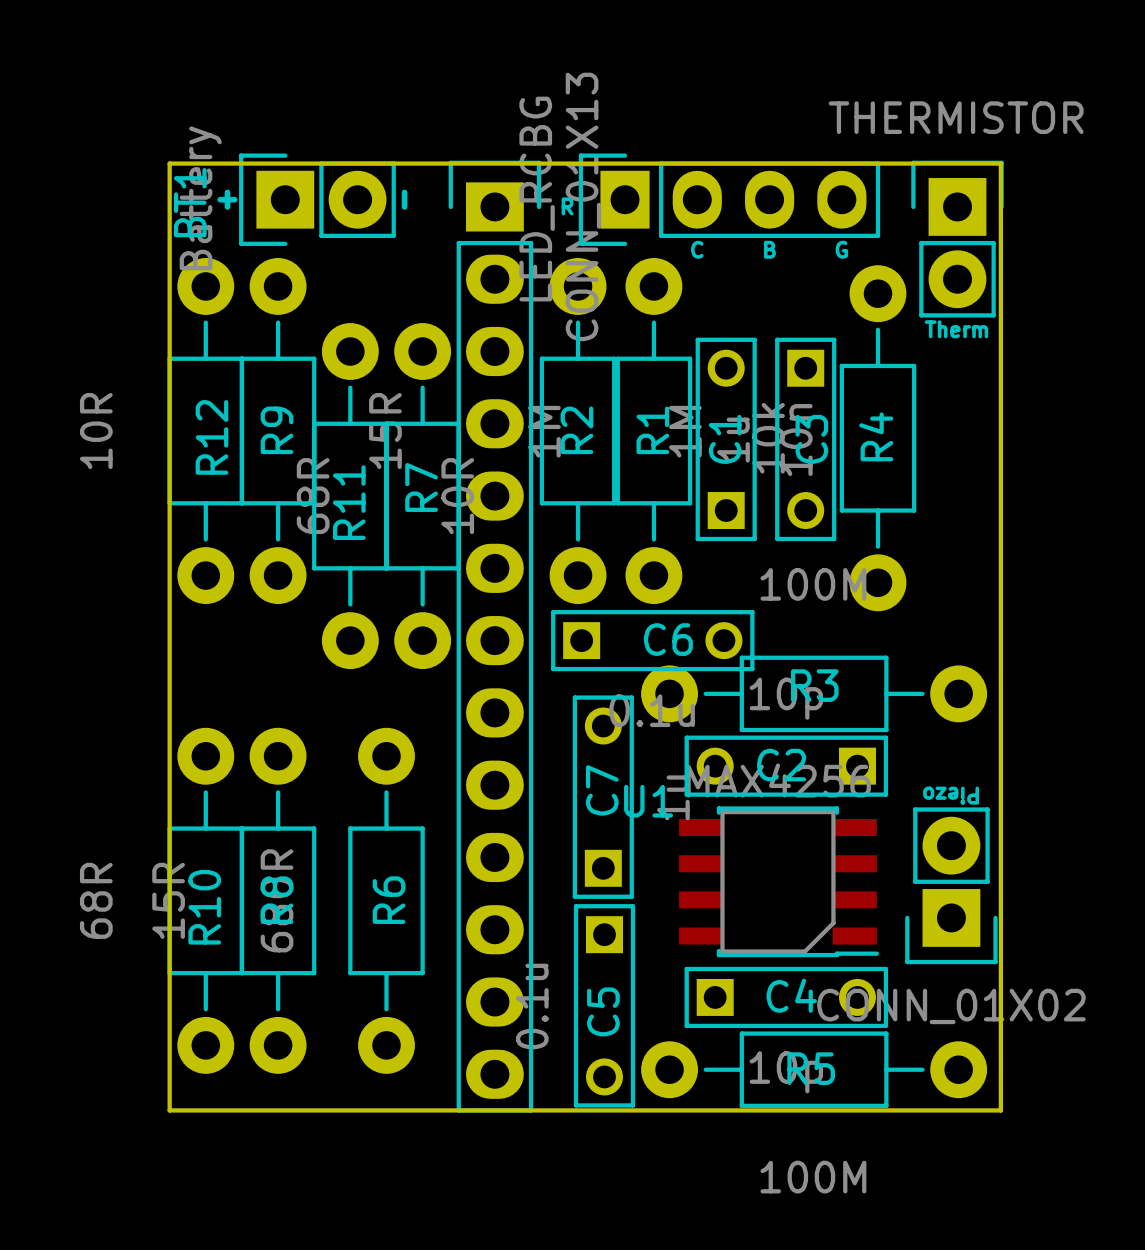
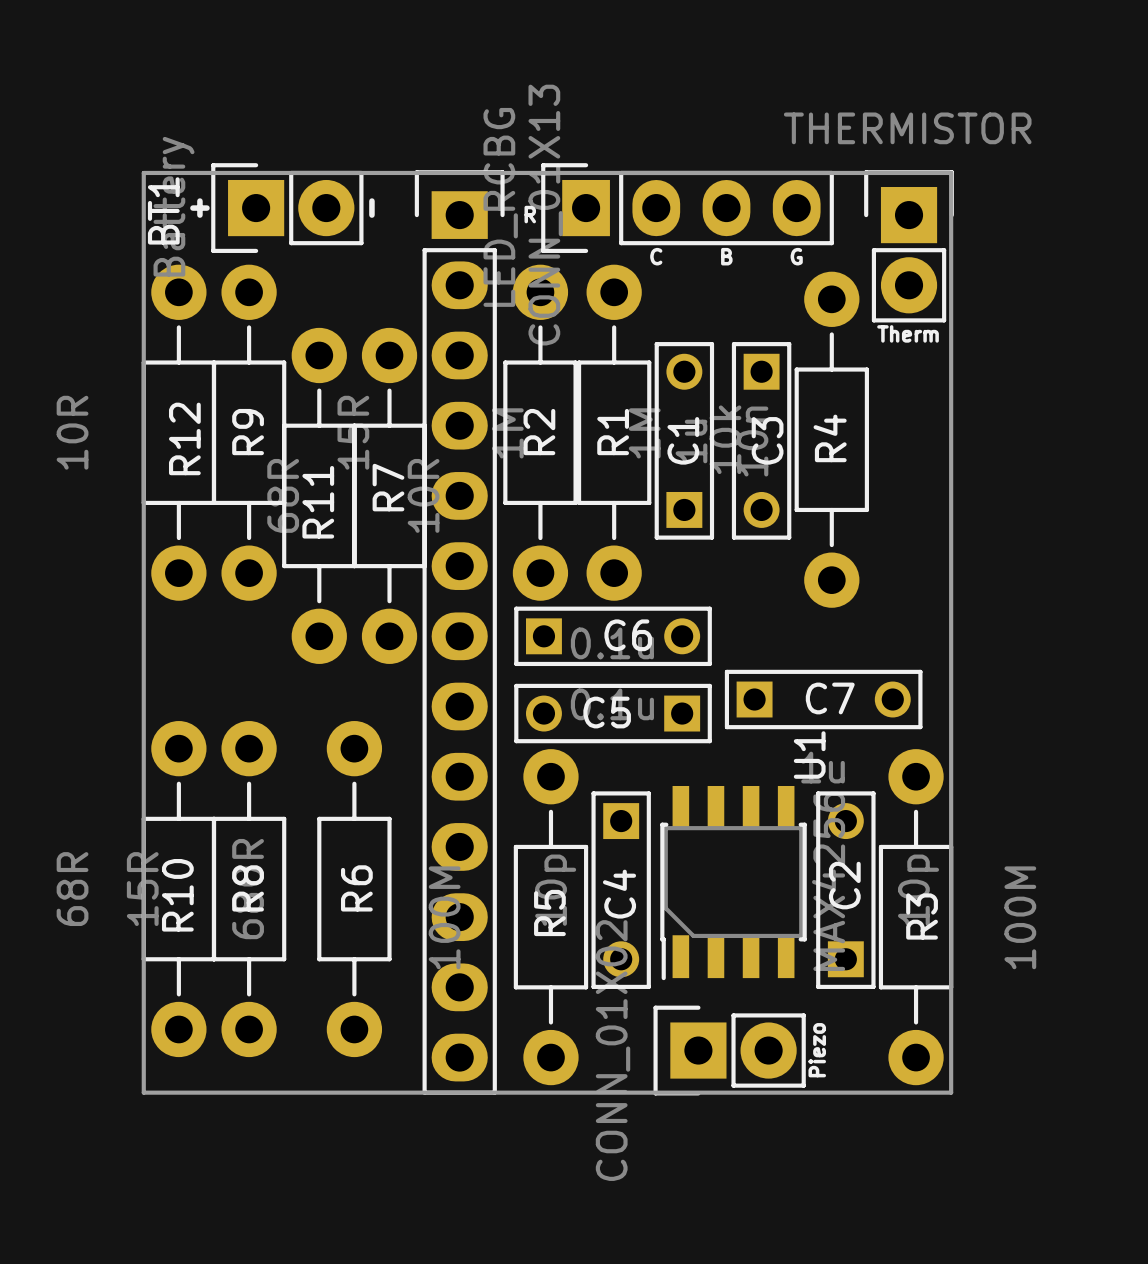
R3 rotation: 0° (814, 693) -> 90° clockwise (916, 917)
R3 position: (814, 693) -> (916, 917)
C2 rotation: 0° (786, 766) -> 90° clockwise (845, 890)
C2 position: (786, 766) -> (845, 890)
text rotation: 0° (951, 795) -> 90° clockwise (817, 1050)
text position: Piezo (951, 795) -> Piezo (817, 1050)
C7 rotation: 0° (603, 797) -> 90° clockwise (823, 699)
C7 position: (603, 797) -> (823, 699)
U1 rotation: 0° (779, 881) -> 90° clockwise (733, 883)
part rotation: 0° (951, 885) -> 90° clockwise (729, 1050)
part position: (951, 885) -> (729, 1050)
C4 rotation: 0° (786, 997) -> 90° clockwise (621, 890)
C4 position: (786, 997) -> (621, 890)
C5 rotation: 0° (604, 1005) -> 90° clockwise (613, 713)
C5 position: (604, 1005) -> (613, 713)
R5 rotation: 0° (814, 1069) -> 90° clockwise (550, 917)
R5 position: (814, 1069) -> (550, 917)

